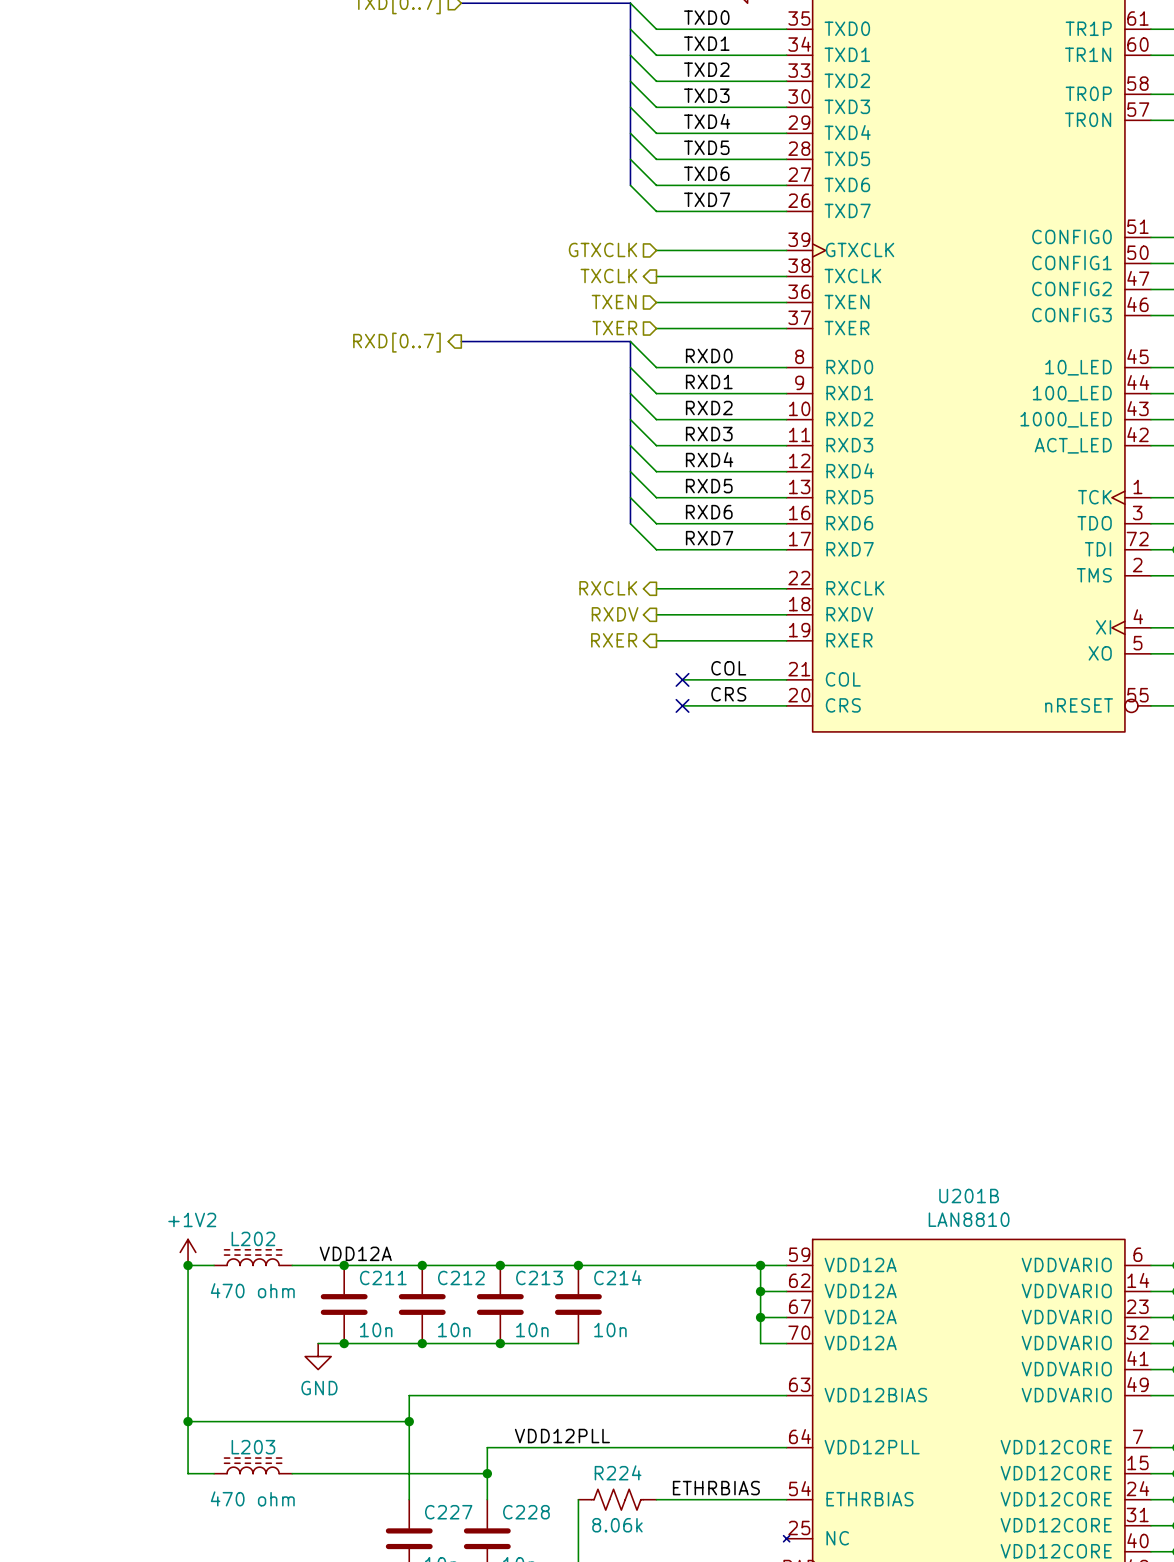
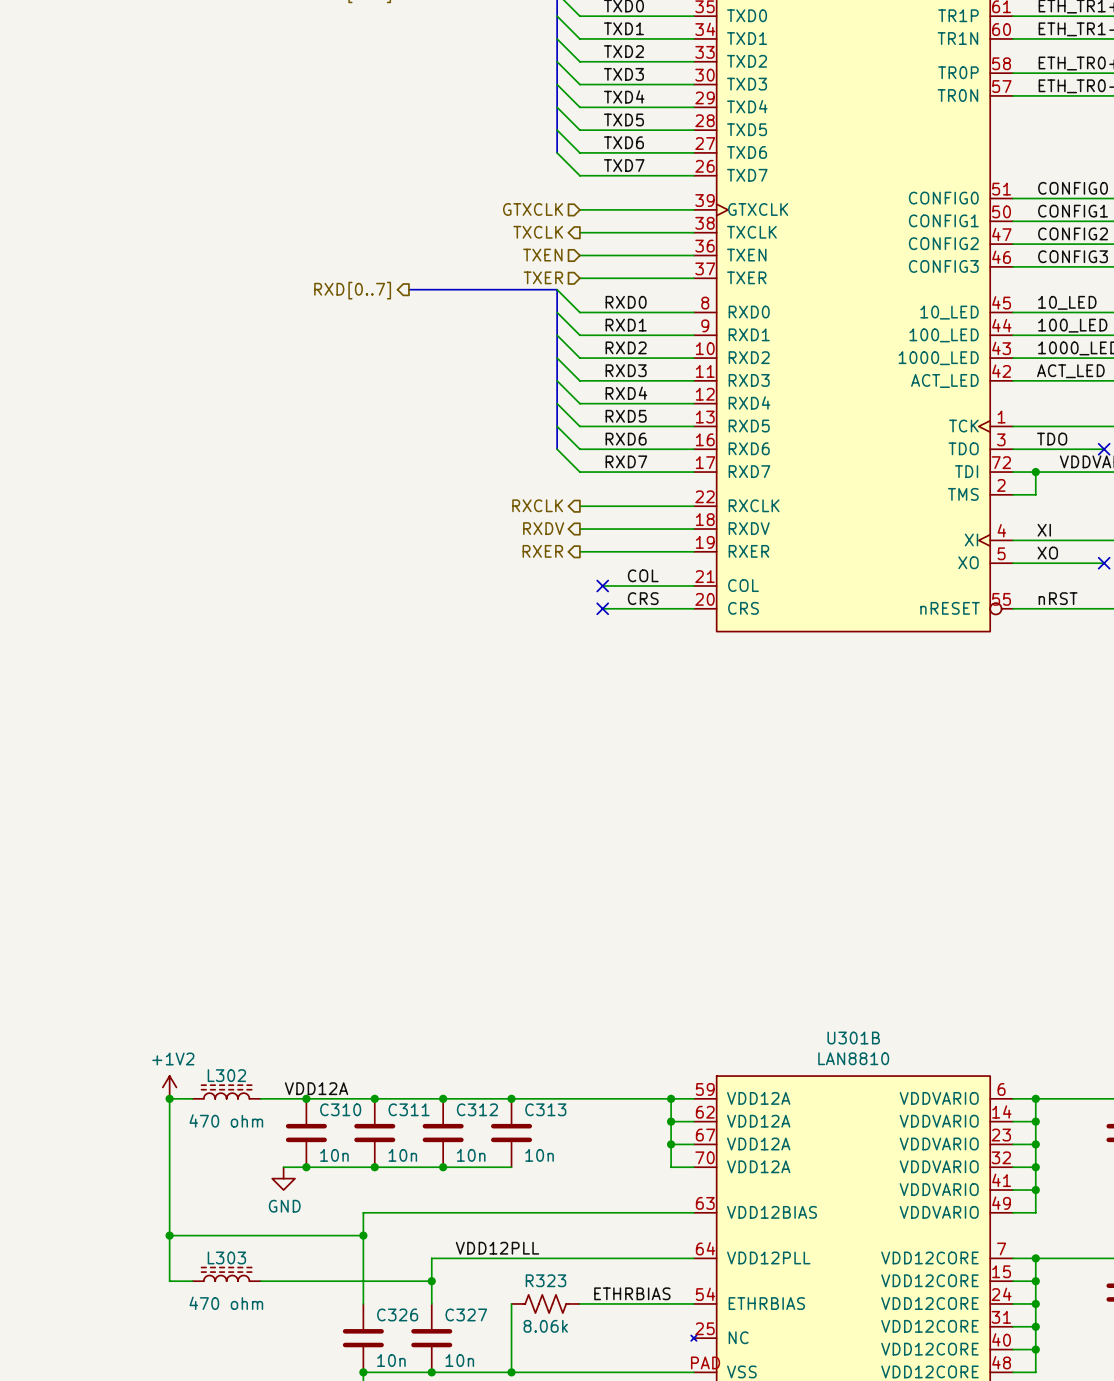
U201B name: U201B (969, 1196) -> U301B (853, 1038)
L202 name: L202 (253, 1238) -> L302 (226, 1075)
C211 name: C211 (383, 1277) -> C310 (340, 1109)
C212 name: C212 (461, 1277) -> C311 (409, 1109)
C213 name: C213 (539, 1277) -> C312 (477, 1109)
C214 name: C214 (617, 1277) -> C313 (545, 1109)
L203 name: L203 (253, 1447) -> L303 (226, 1257)
R224 name: R224 (618, 1472) -> R323 (545, 1280)
C227 name: C227 (448, 1512) -> C326 (397, 1314)
C228 name: C228 (526, 1512) -> C327 (466, 1314)

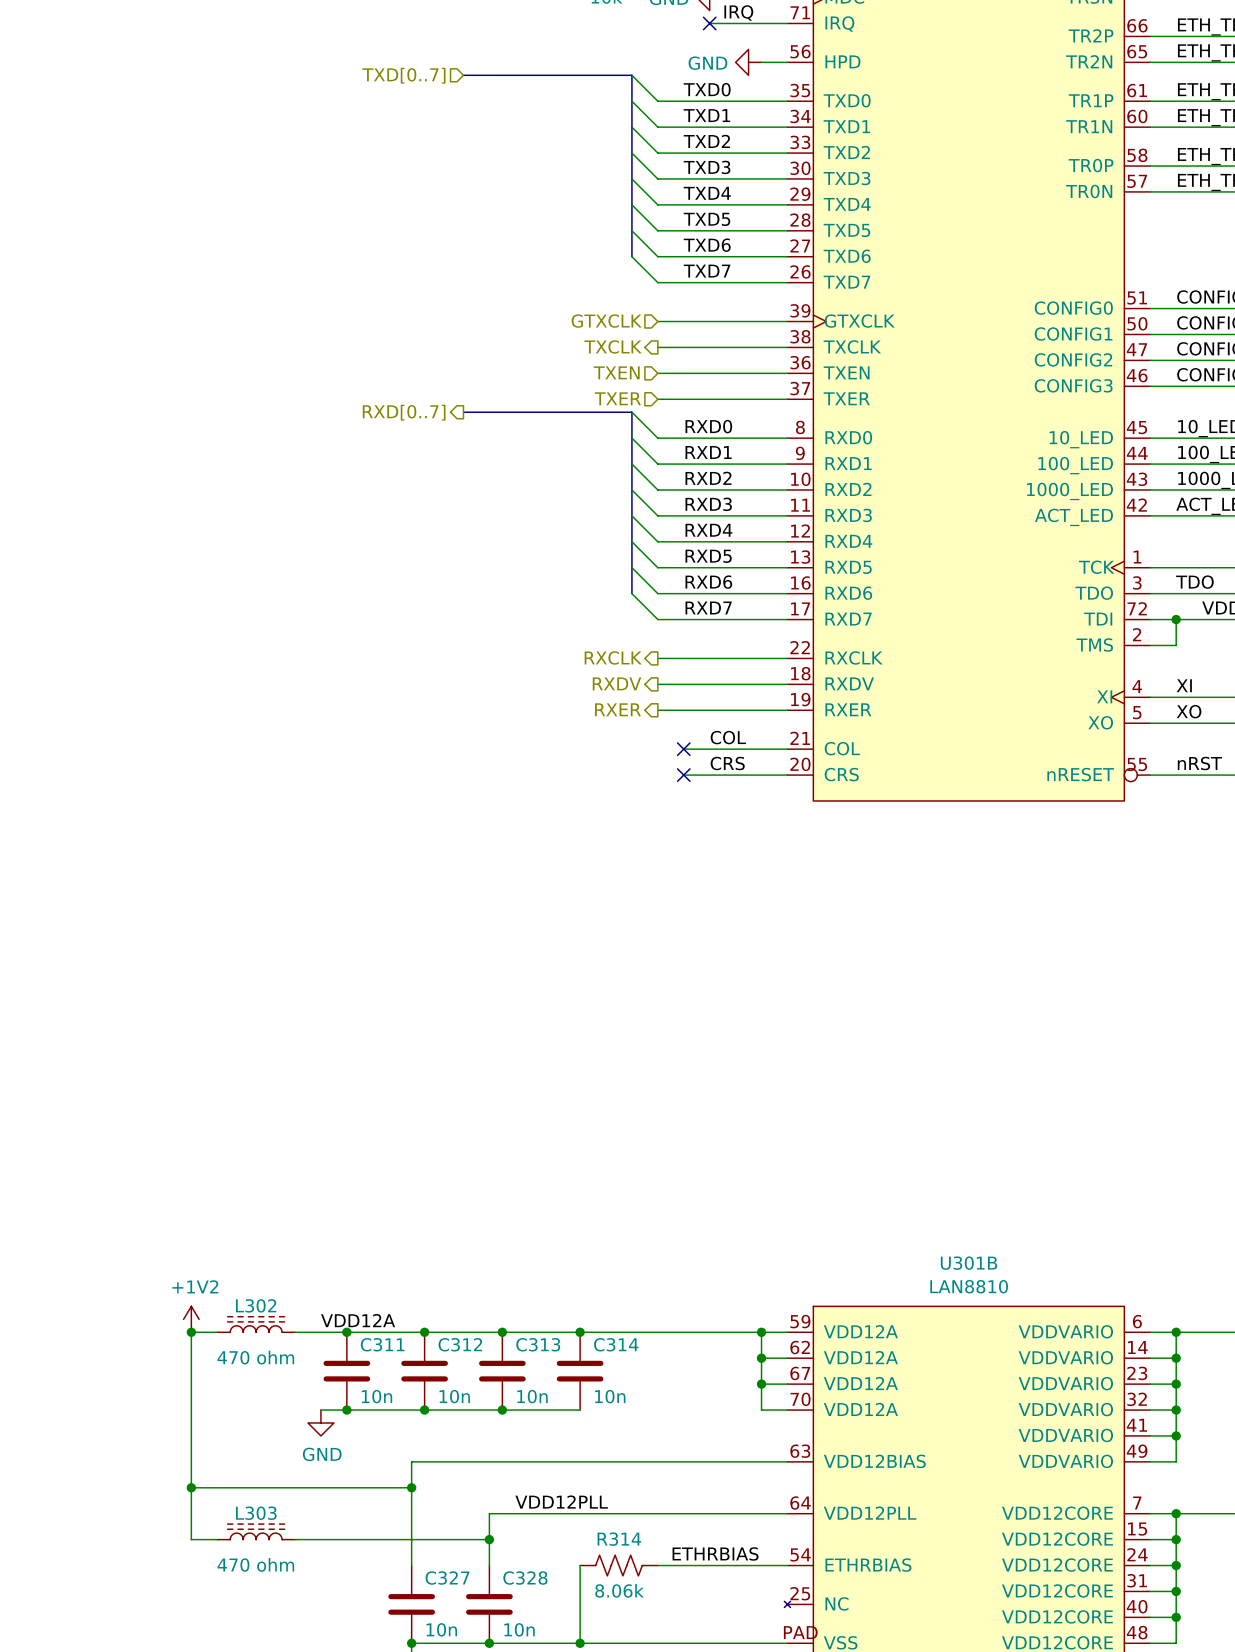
C310 name: C310 (340, 1109) -> C311 (382, 1344)
C311 name: C311 (409, 1109) -> C312 (460, 1344)
C312 name: C312 (477, 1109) -> C313 (538, 1344)
C313 name: C313 (545, 1109) -> C314 (616, 1344)
R323 name: R323 (545, 1280) -> R314 (619, 1539)
C326 name: C326 (397, 1314) -> C327 (447, 1578)
C327 name: C327 (466, 1314) -> C328 (525, 1578)

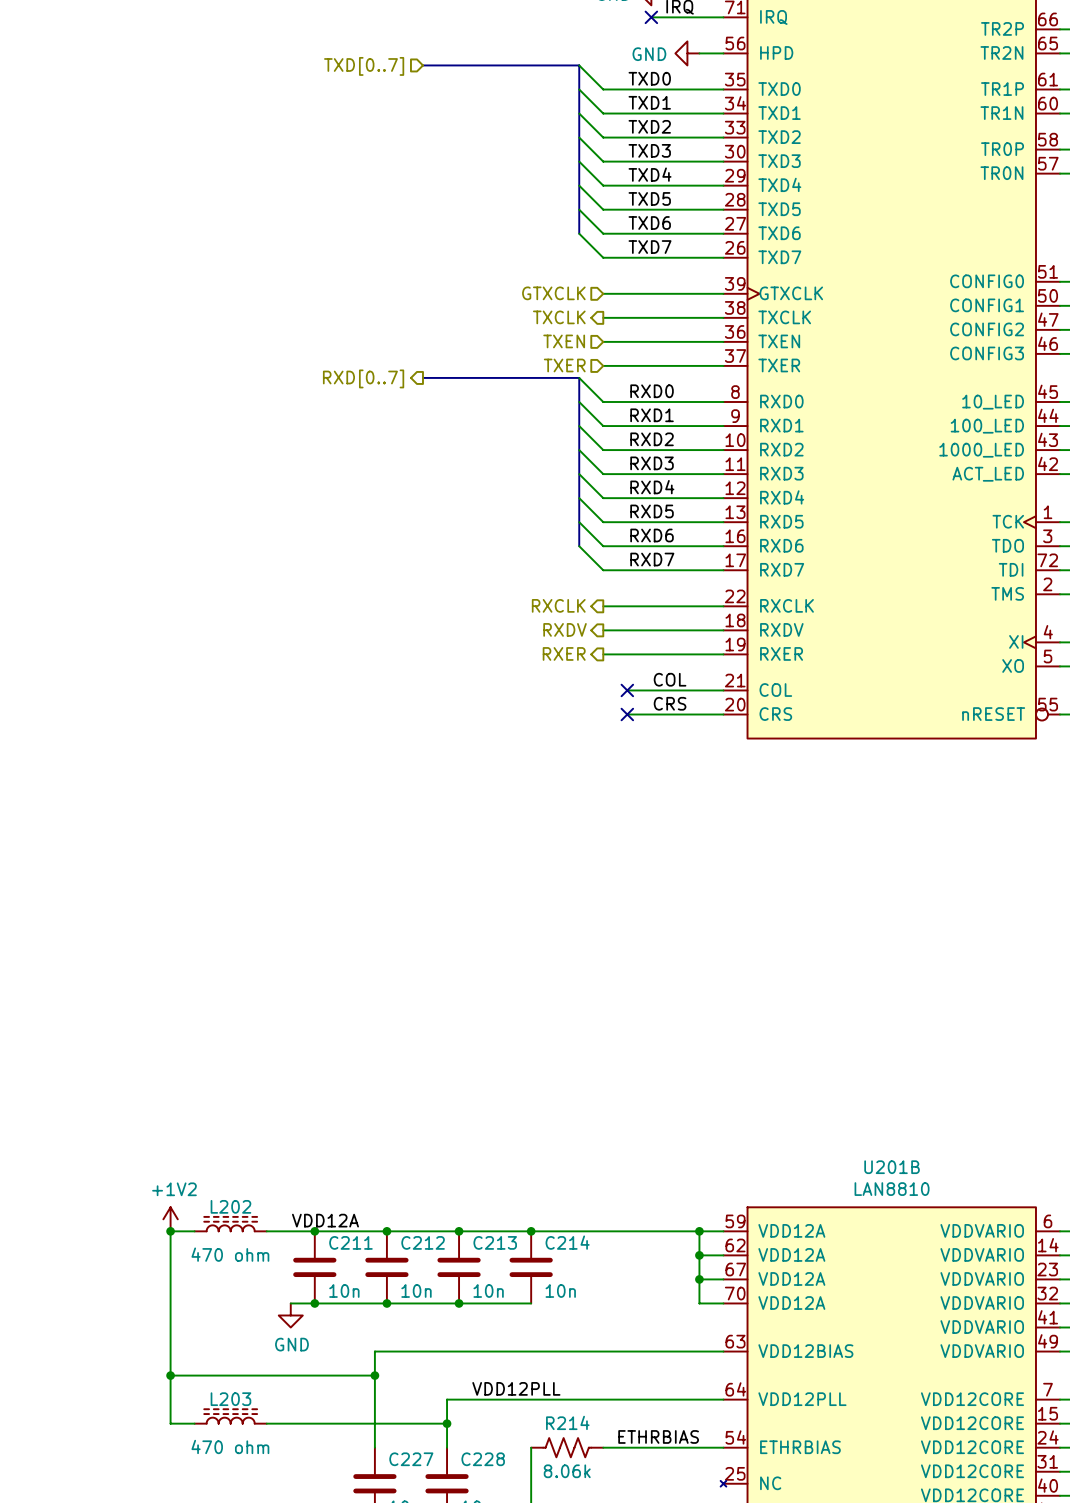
U301B name: U301B (969, 1263) -> U201B (892, 1167)
L302 name: L302 (256, 1305) -> L202 (230, 1206)
C311 name: C311 (382, 1344) -> C211 (350, 1242)
C312 name: C312 (460, 1344) -> C212 (423, 1242)
C313 name: C313 (538, 1344) -> C213 (495, 1242)
C314 name: C314 (616, 1344) -> C214 (567, 1242)
L303 name: L303 (256, 1513) -> L203 (230, 1399)
R314 name: R314 (619, 1539) -> R214 (567, 1422)
C327 name: C327 (447, 1578) -> C227 (411, 1459)
C328 name: C328 (525, 1578) -> C228 (483, 1459)

